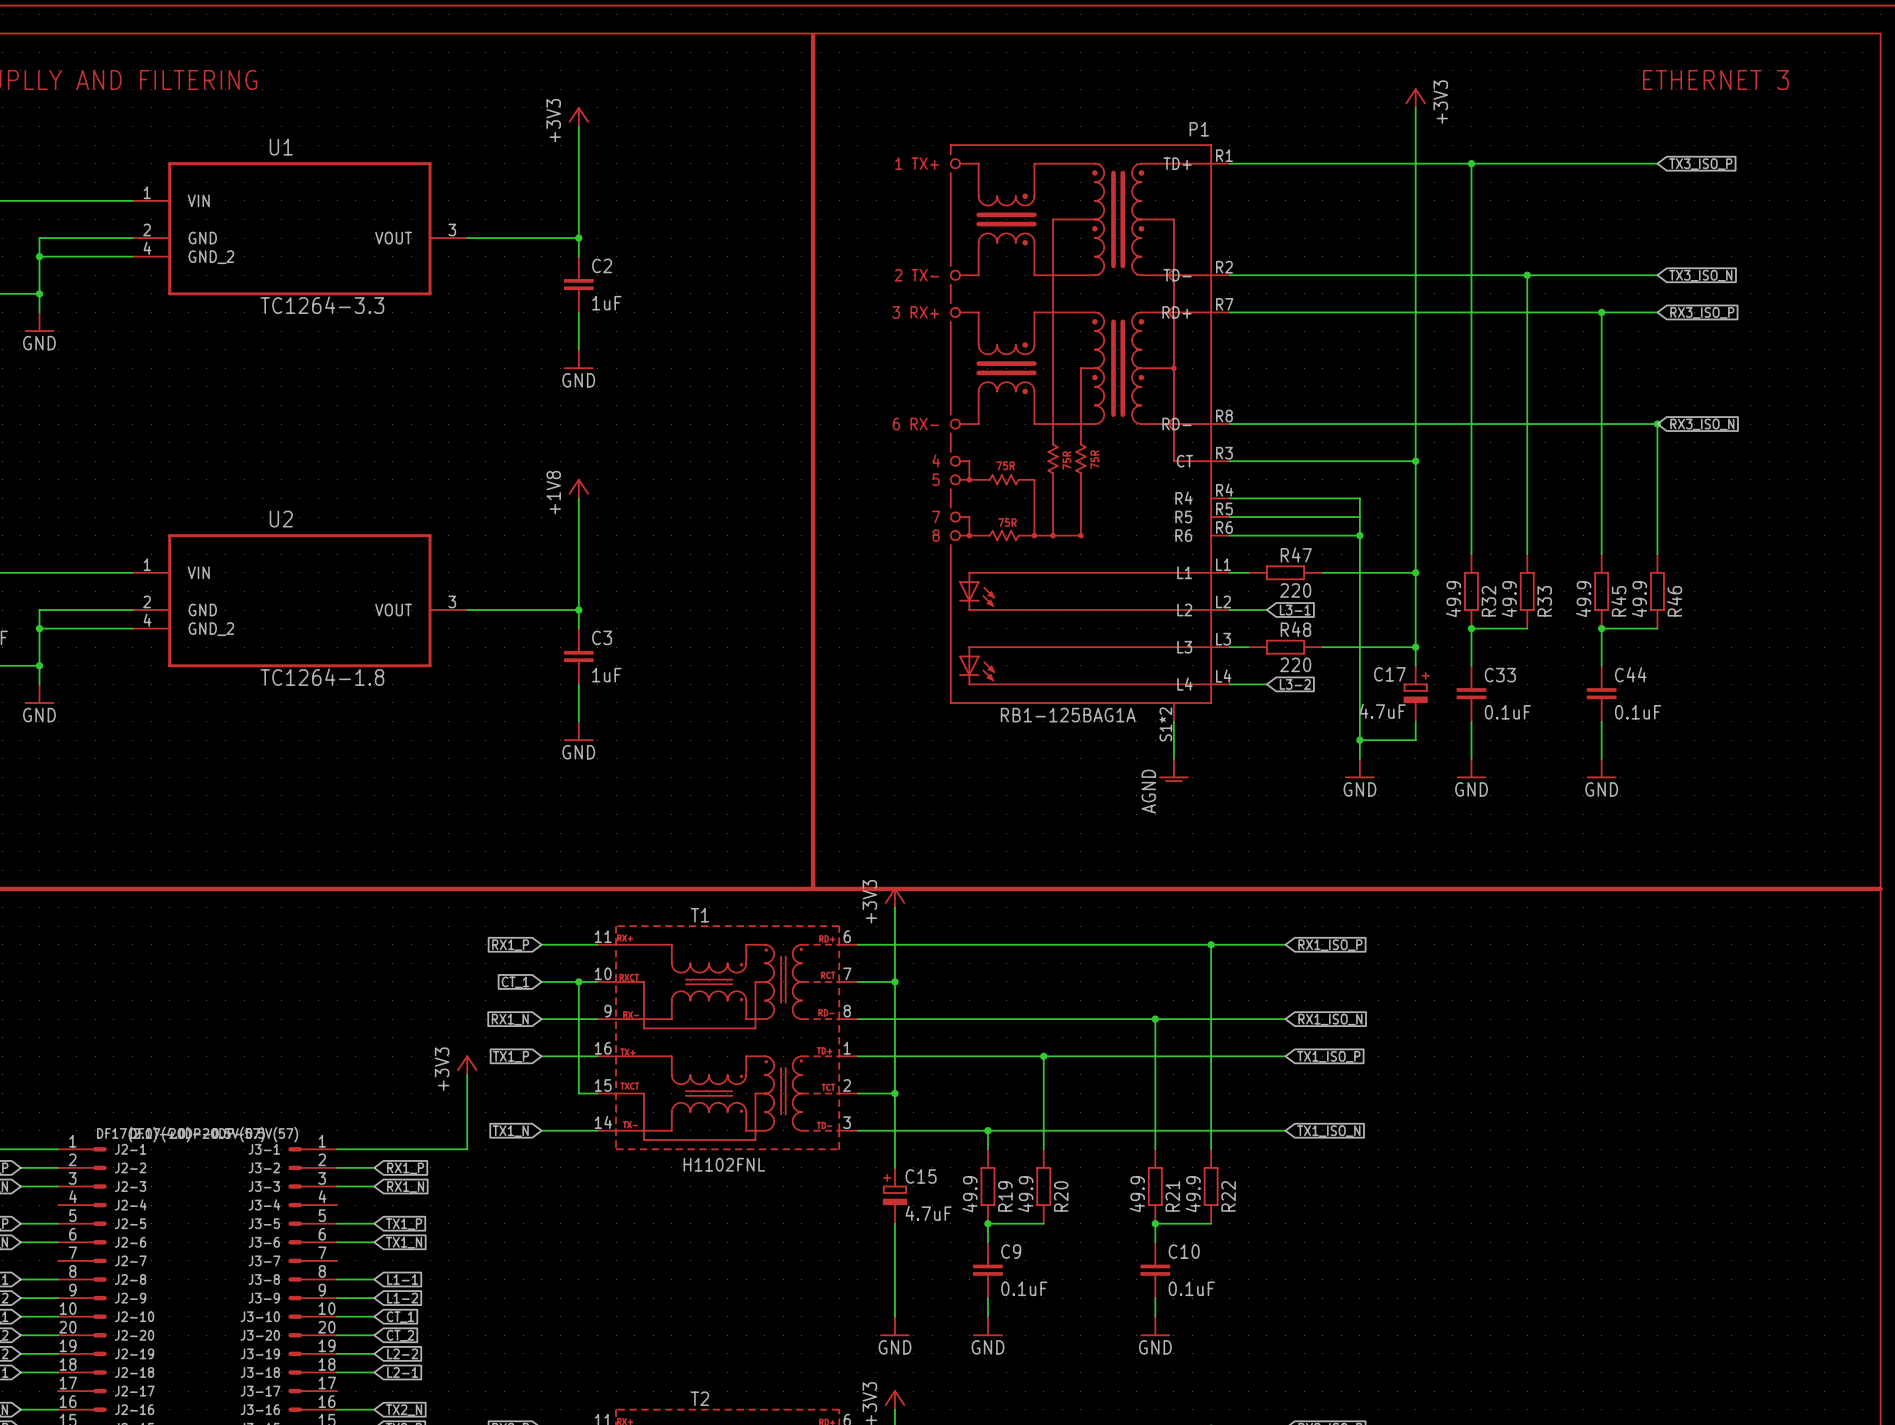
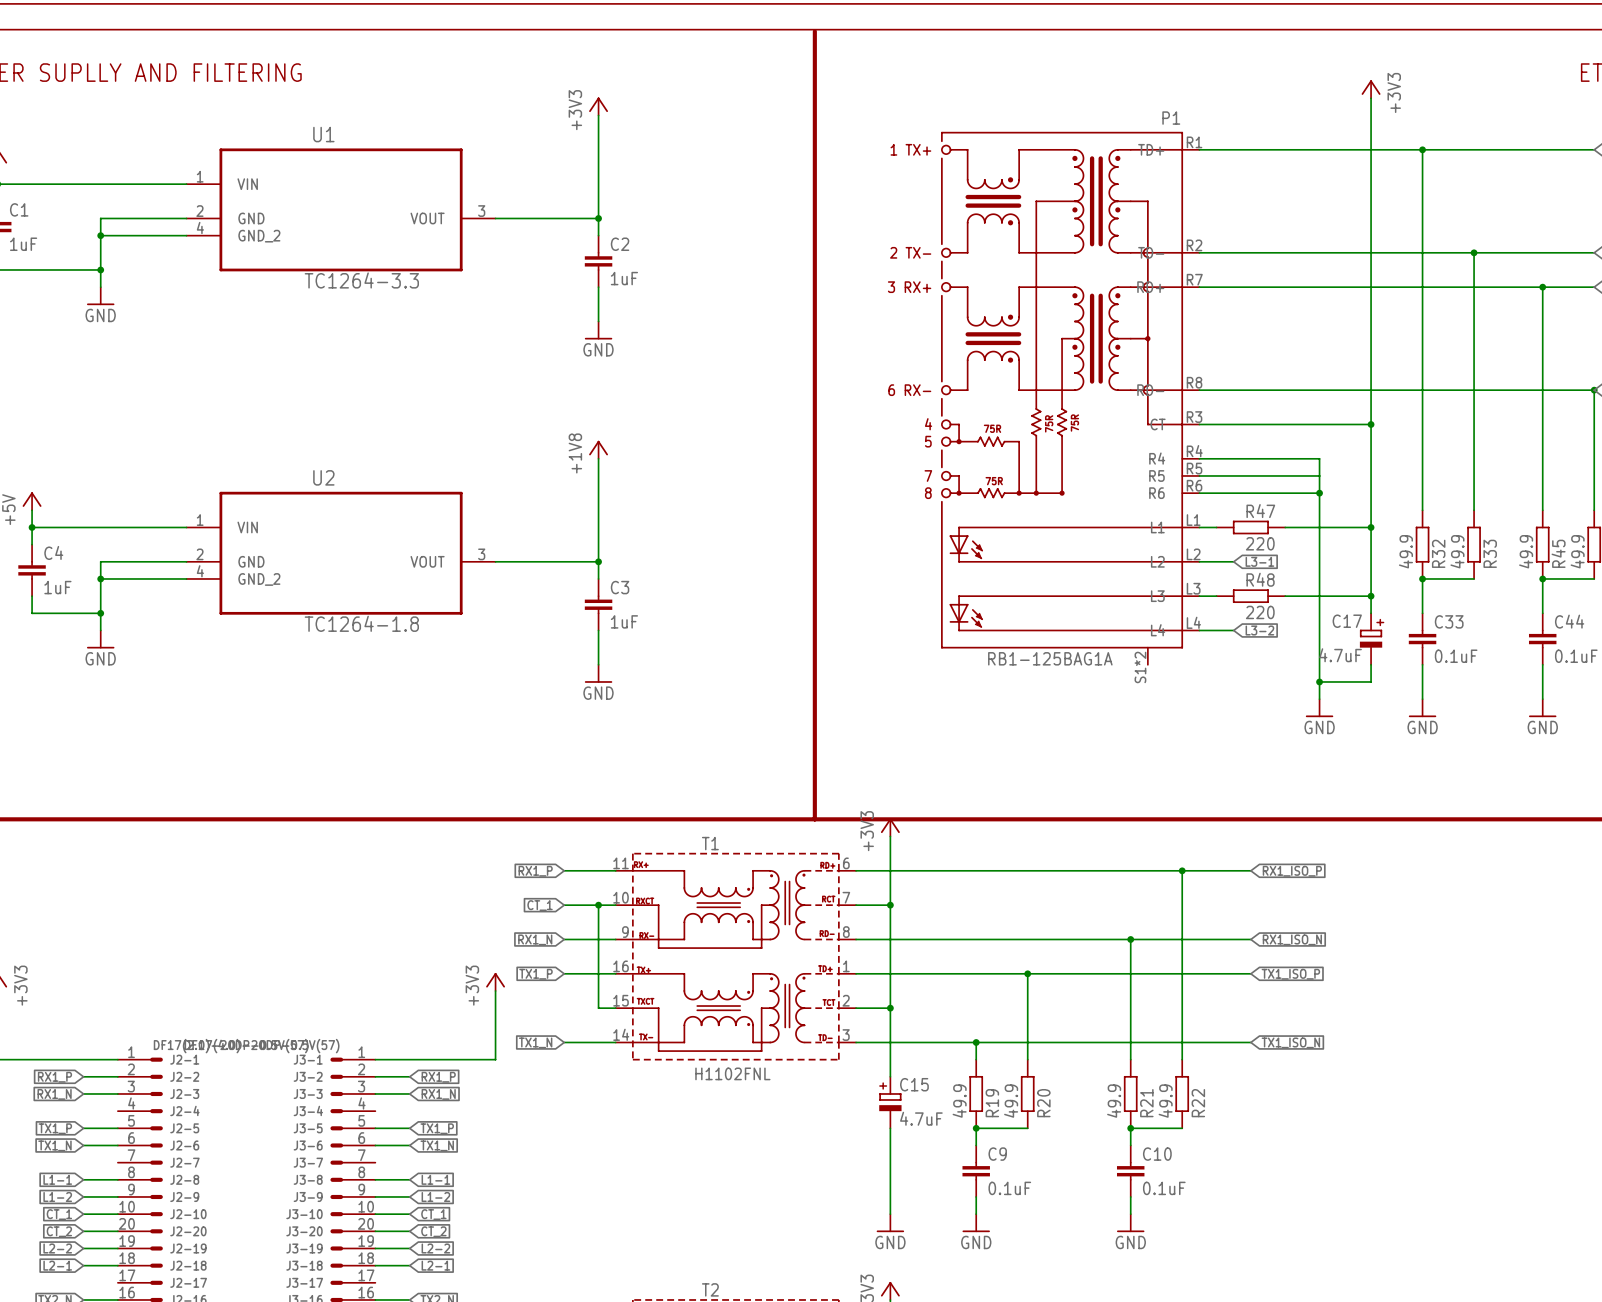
wire: (1173, 721) (1173, 758) -> none
power symbol: AGND (1173, 770) -> none

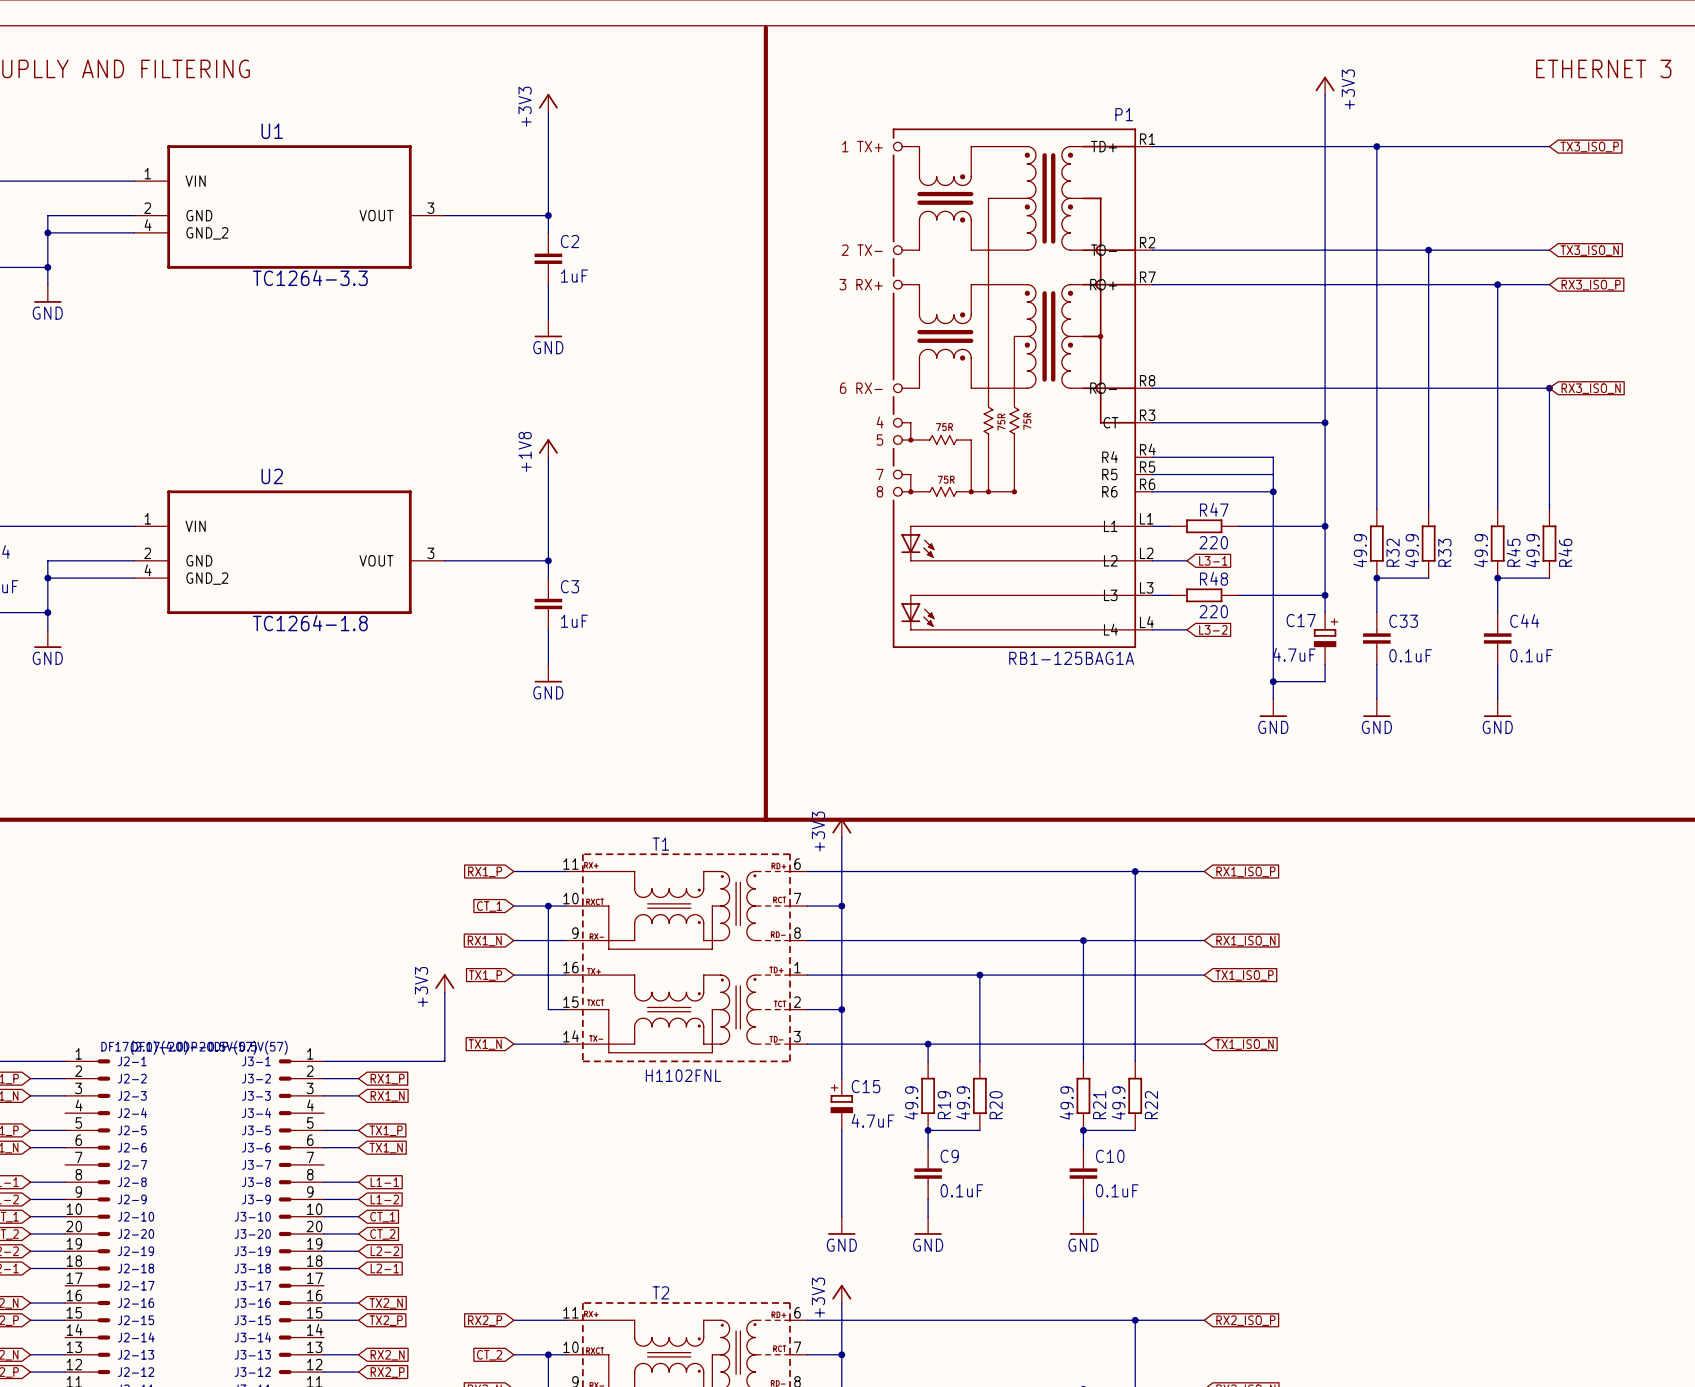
P1 symbol: [941, 131, 1200, 665] -> [892, 128, 1153, 649]
P1 value position: RB1-125BAG1A (1050, 658) -> RB1-125BAG1A (1071, 658)

